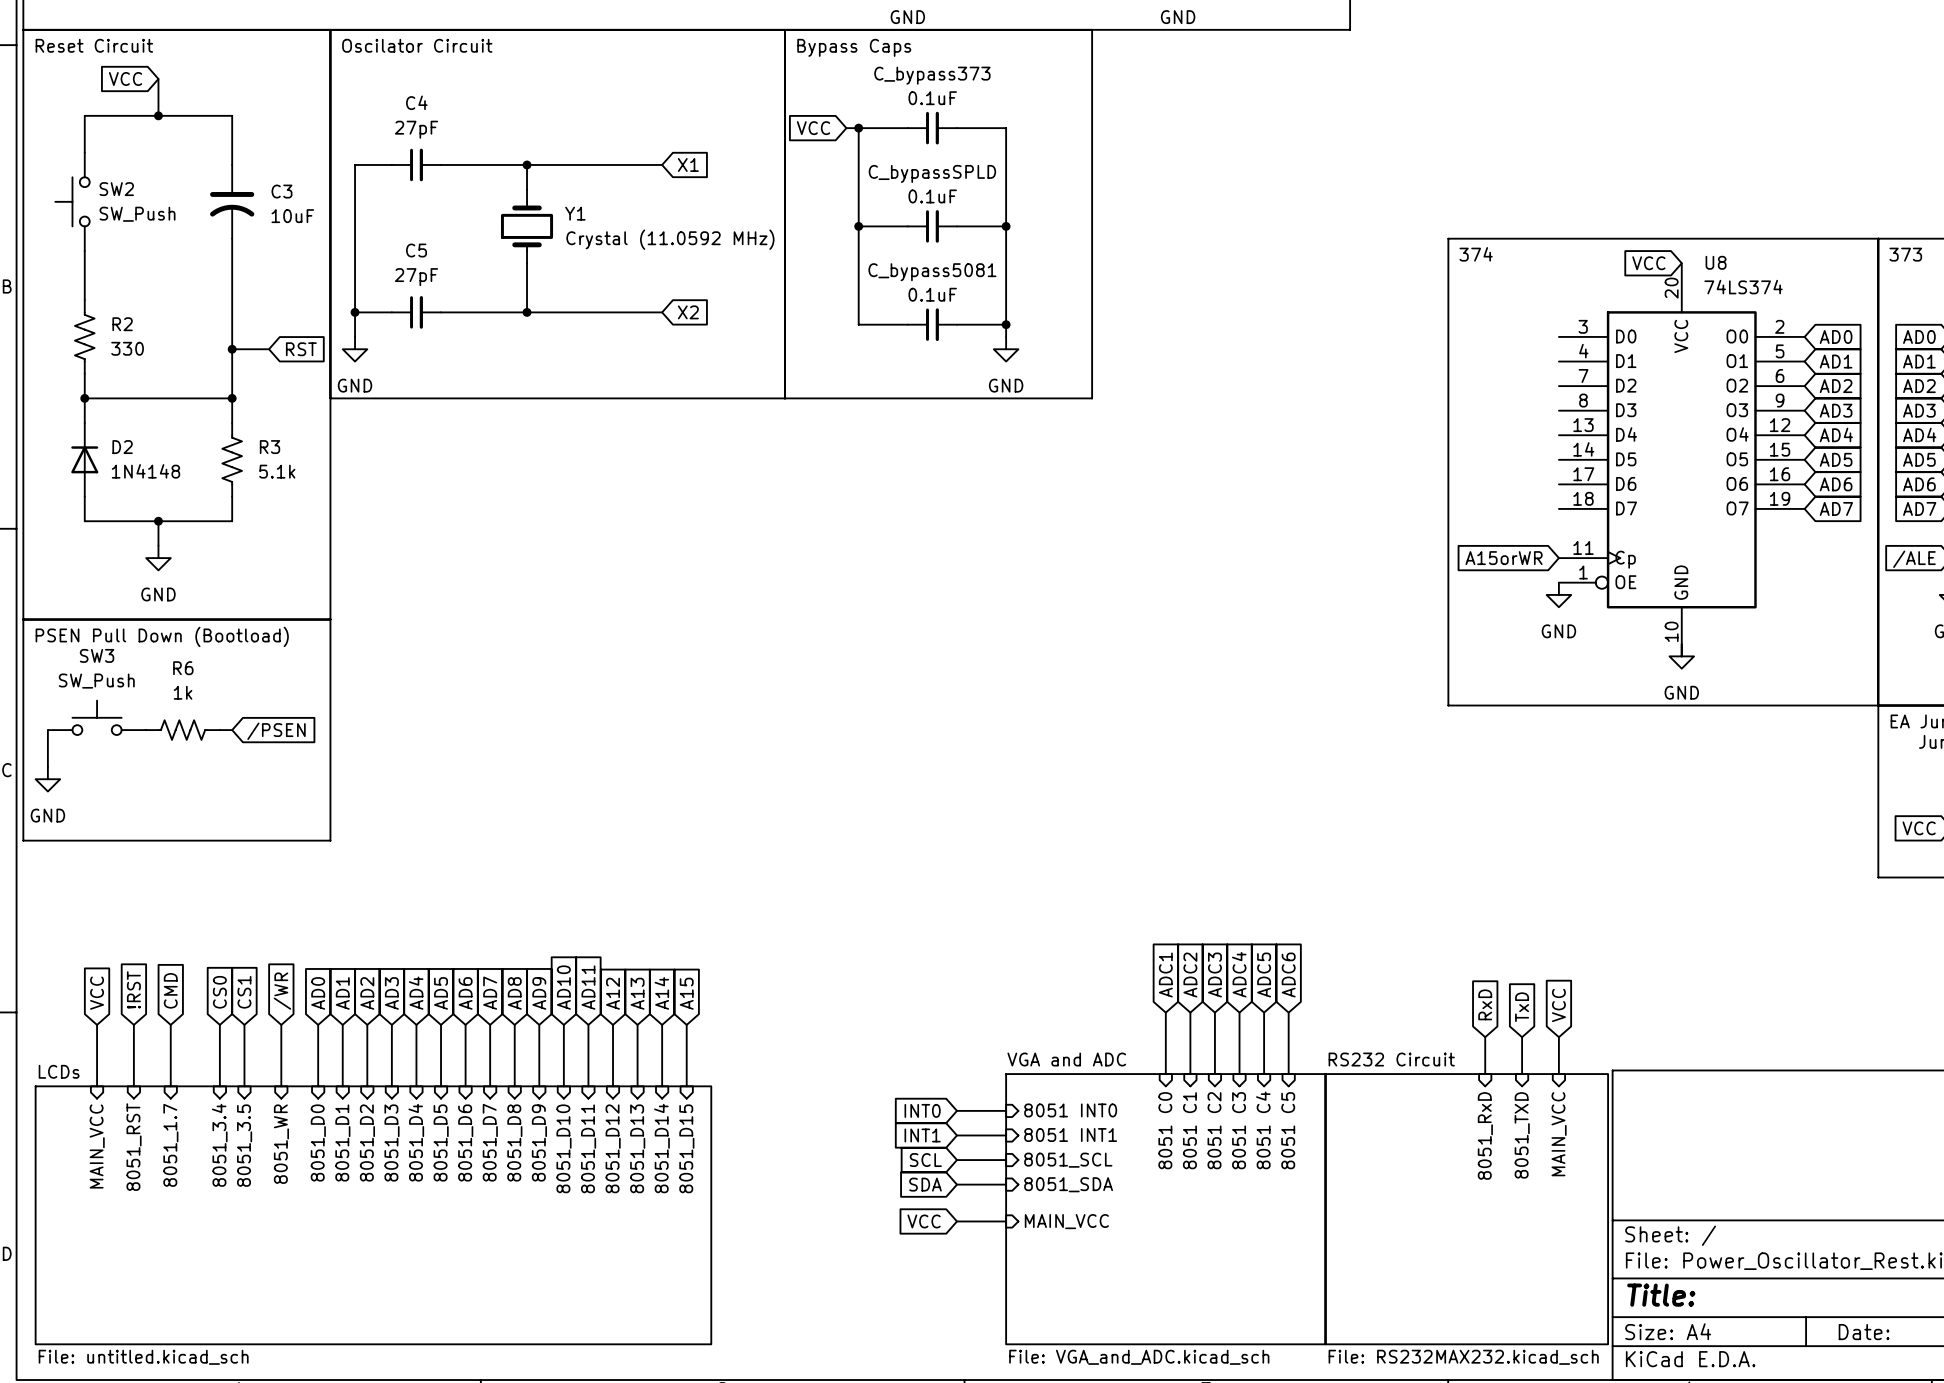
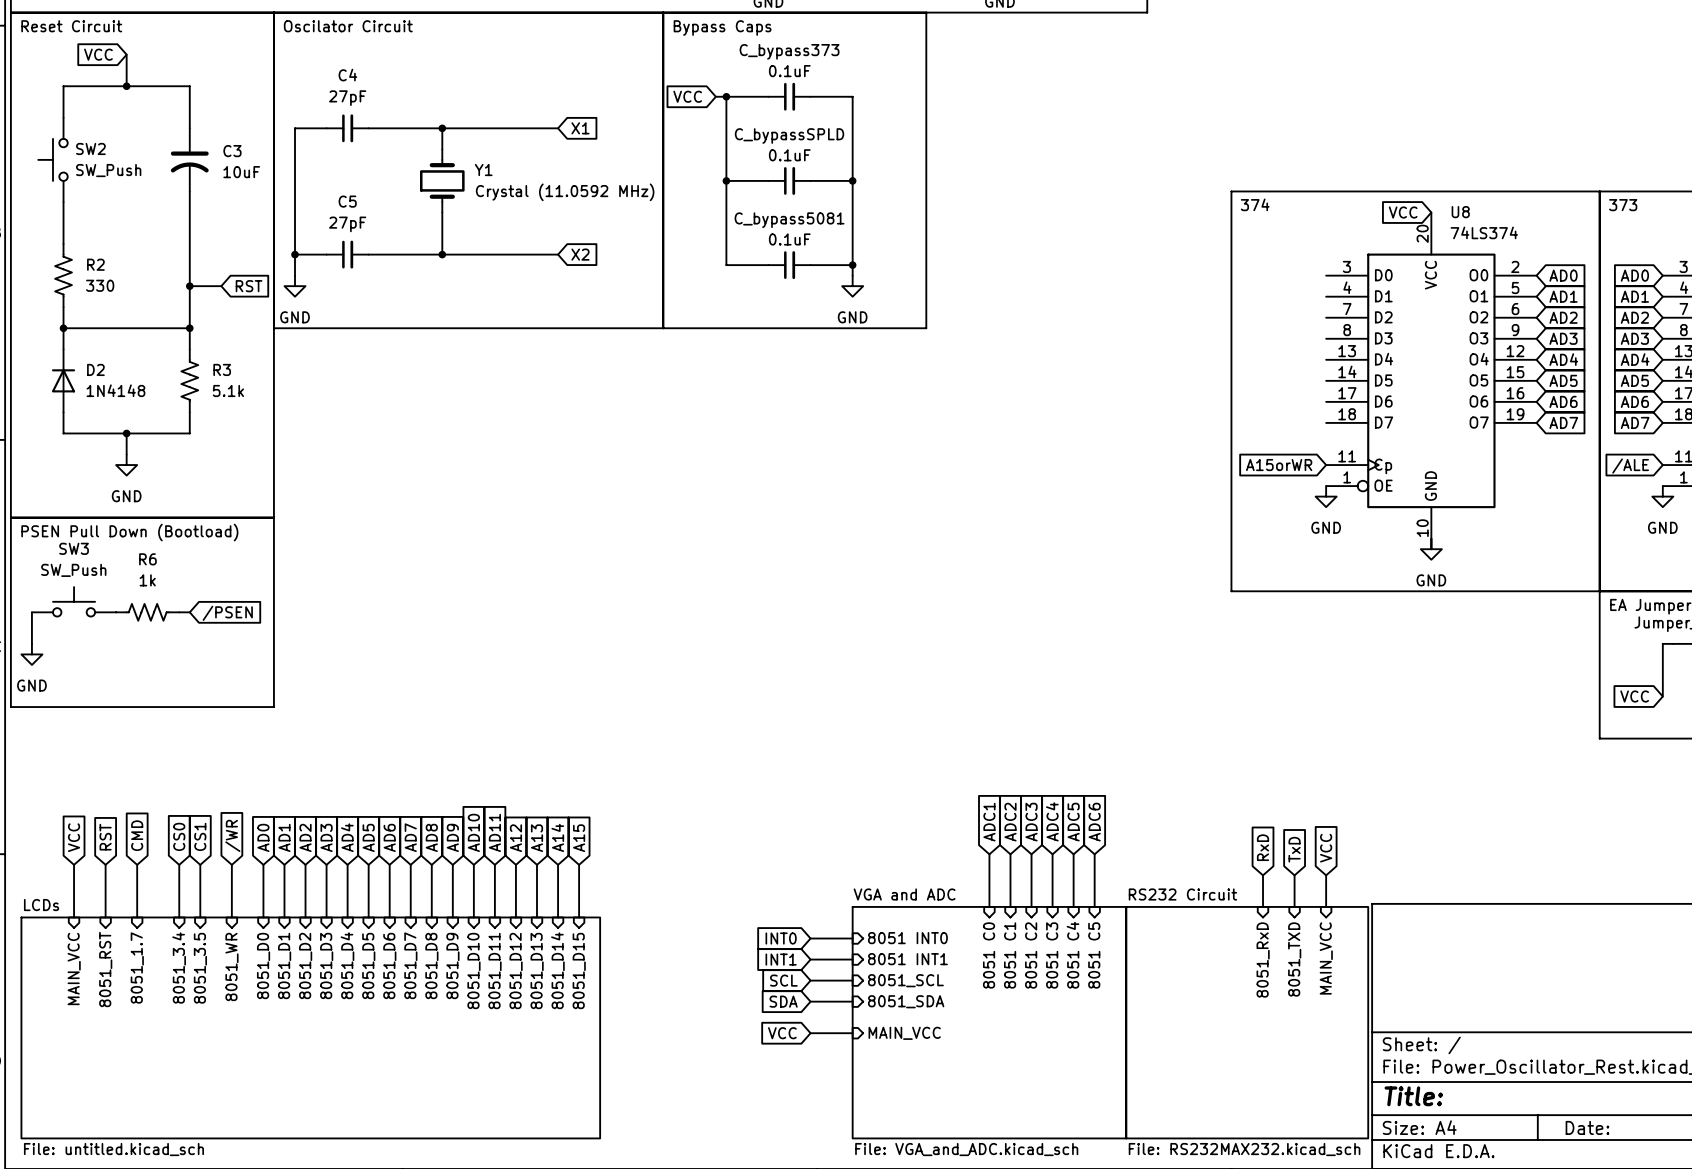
global label: !RST (133, 989) -> RST (105, 837)

